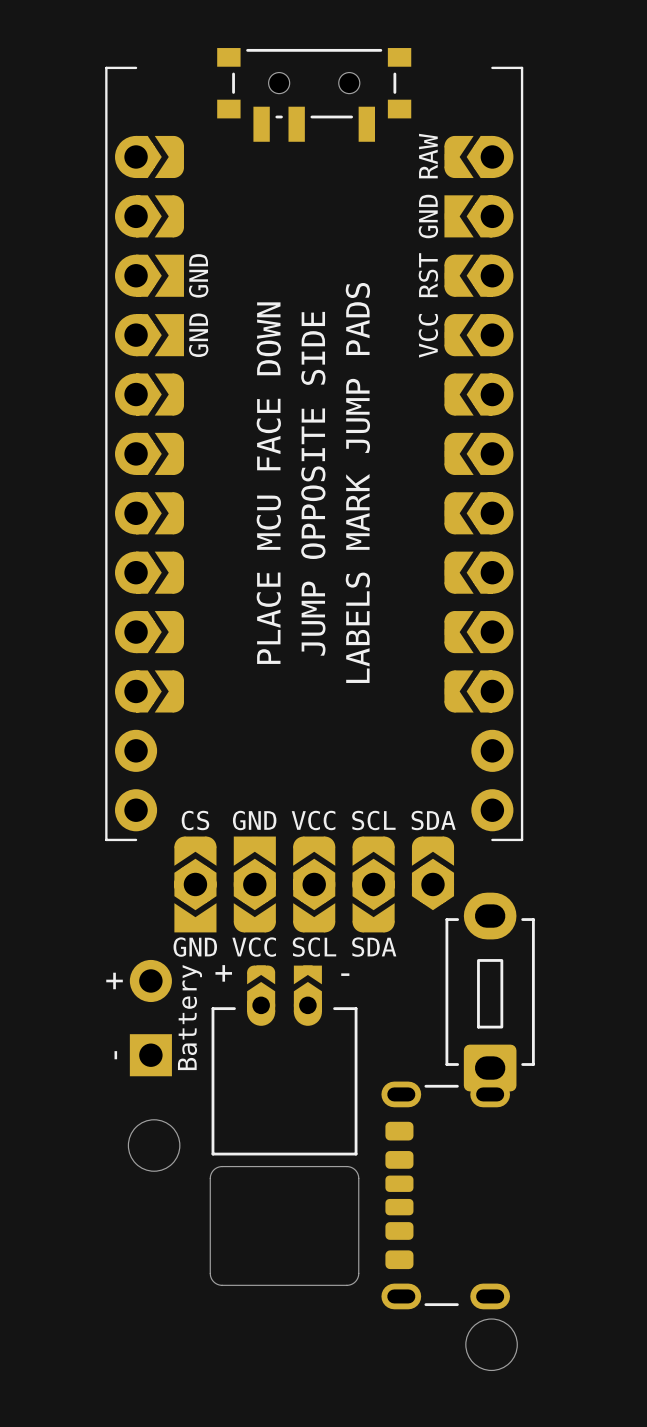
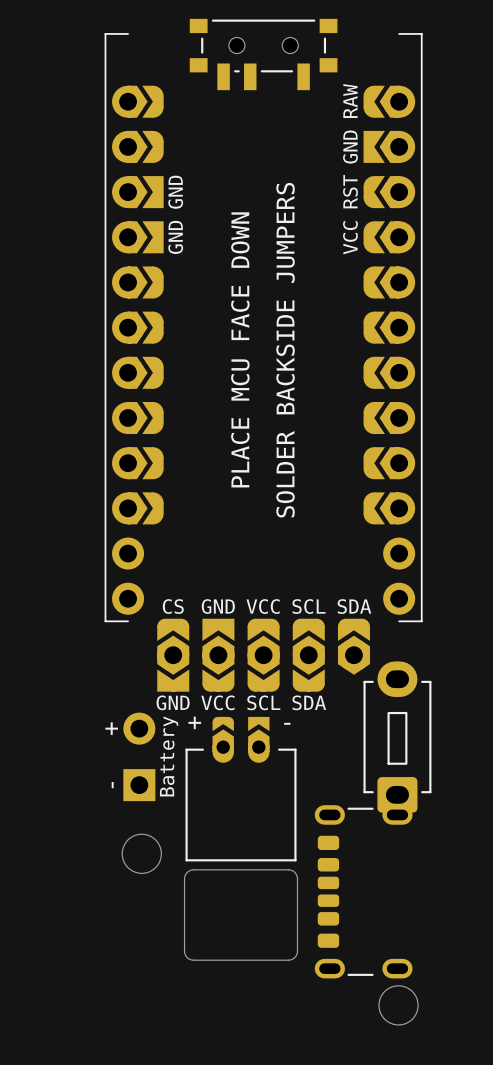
part footprint: [105, 66, 524, 842] -> [104, 33, 423, 623]

